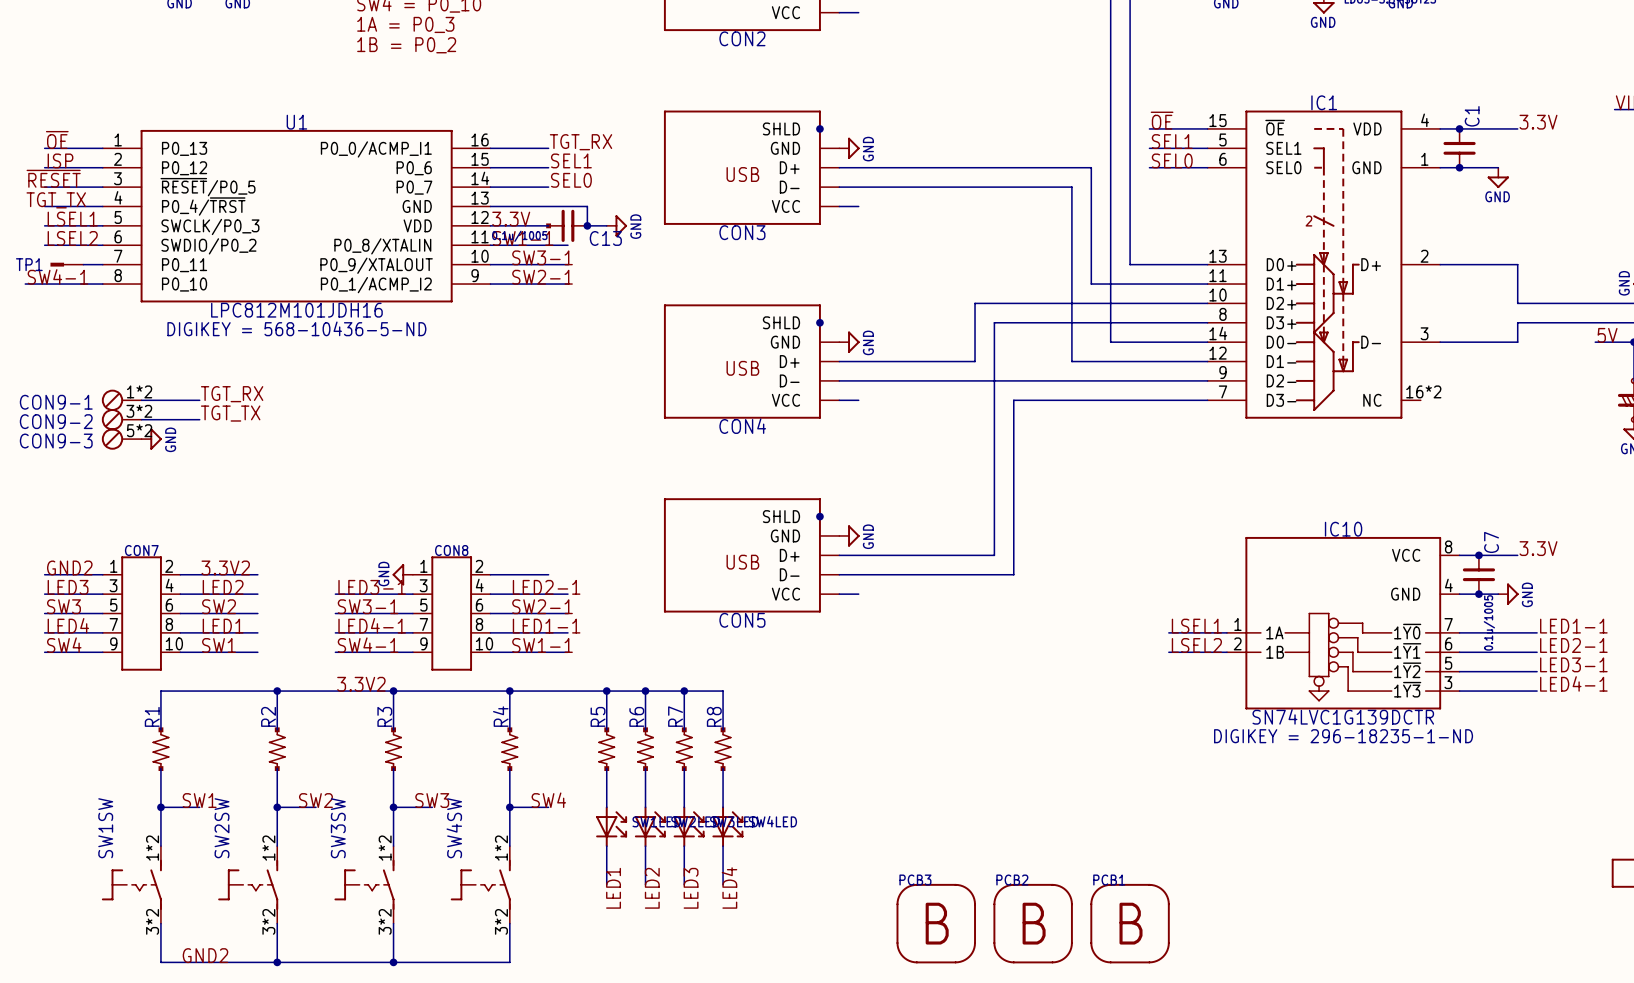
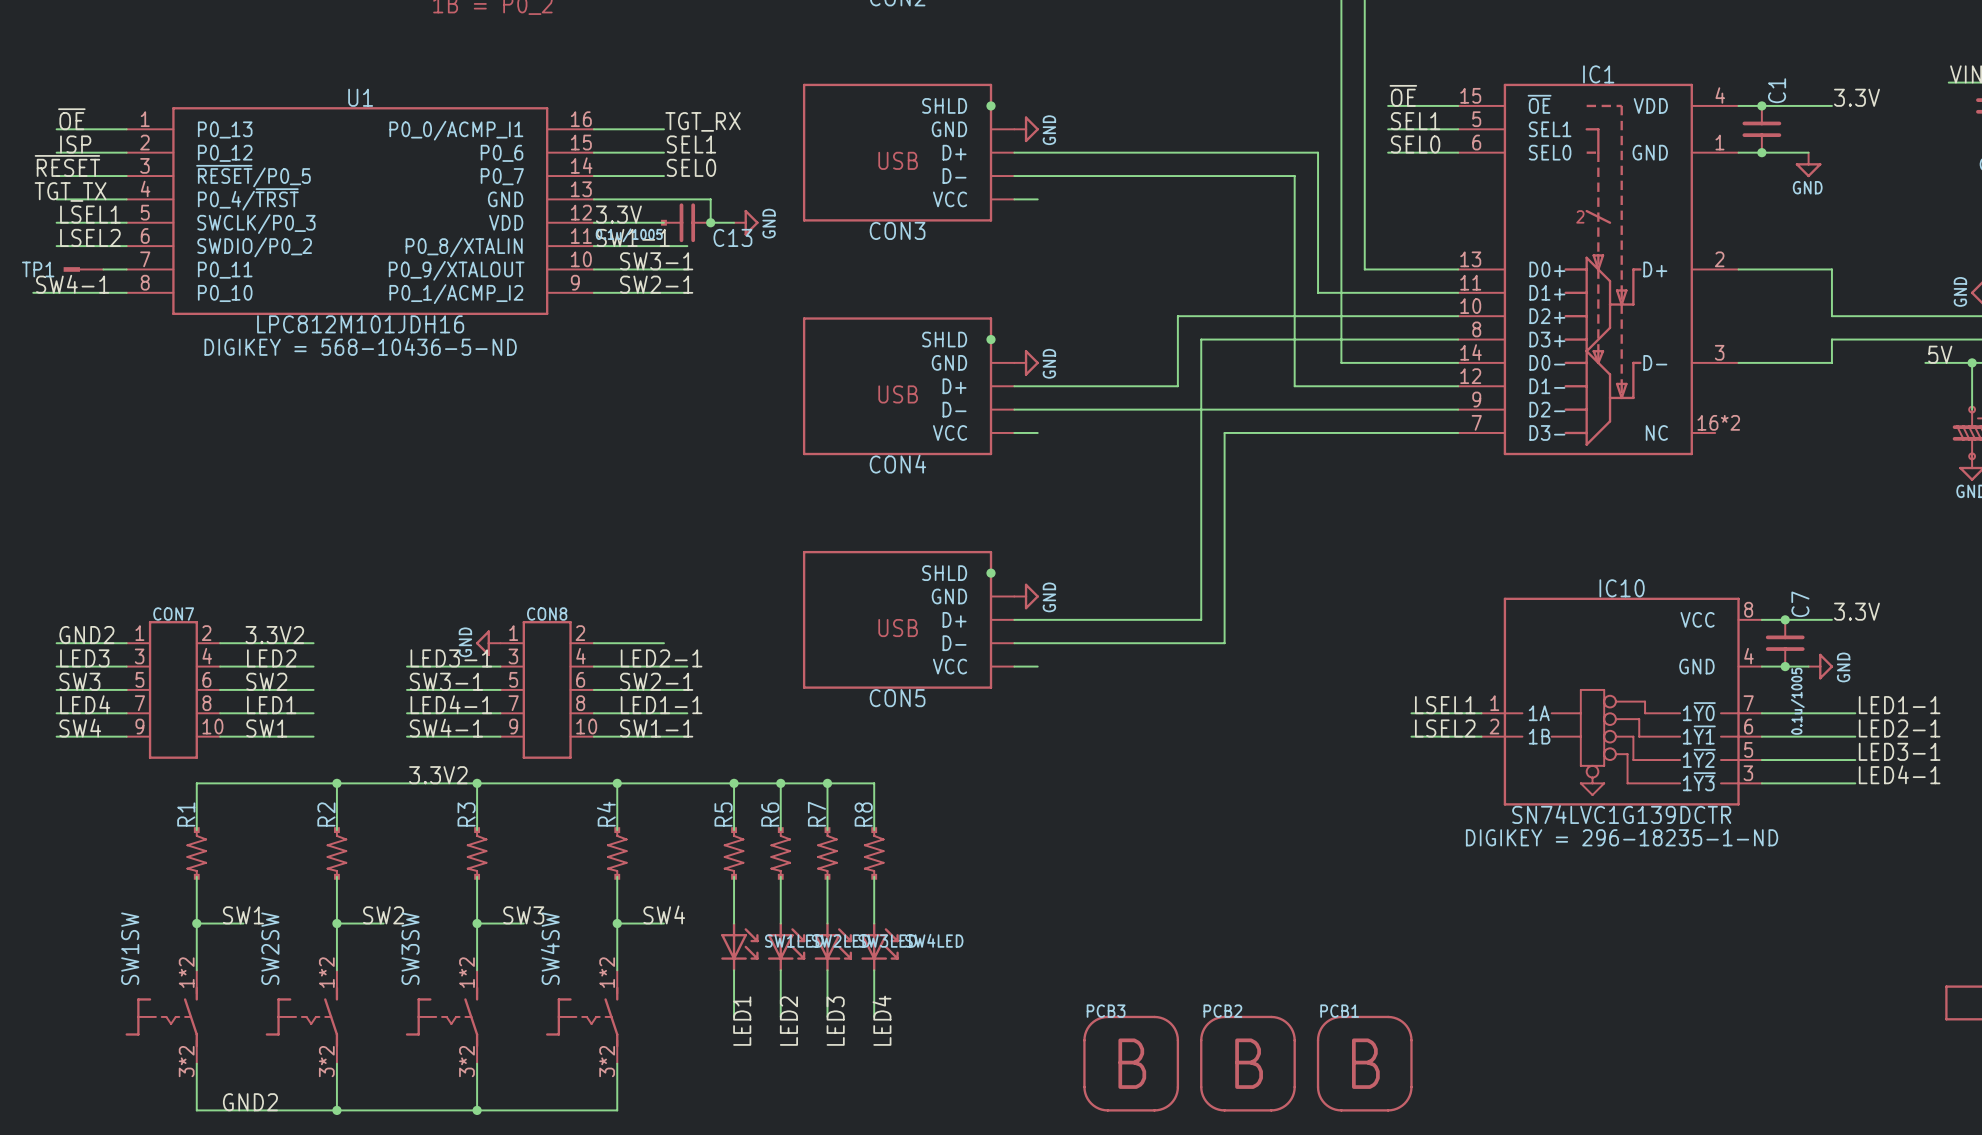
label: TGT_RX (232, 394) -> none
CON9-1: (121, 400) -> none
wire: (141, 400) (199, 400) -> none
label: TGT_TX (230, 413) -> none
CON9-2: (121, 419) -> none
wire: (141, 419) (199, 419) -> none
CON9-3: (121, 439) -> none
power symbol: GND (151, 439) -> none

